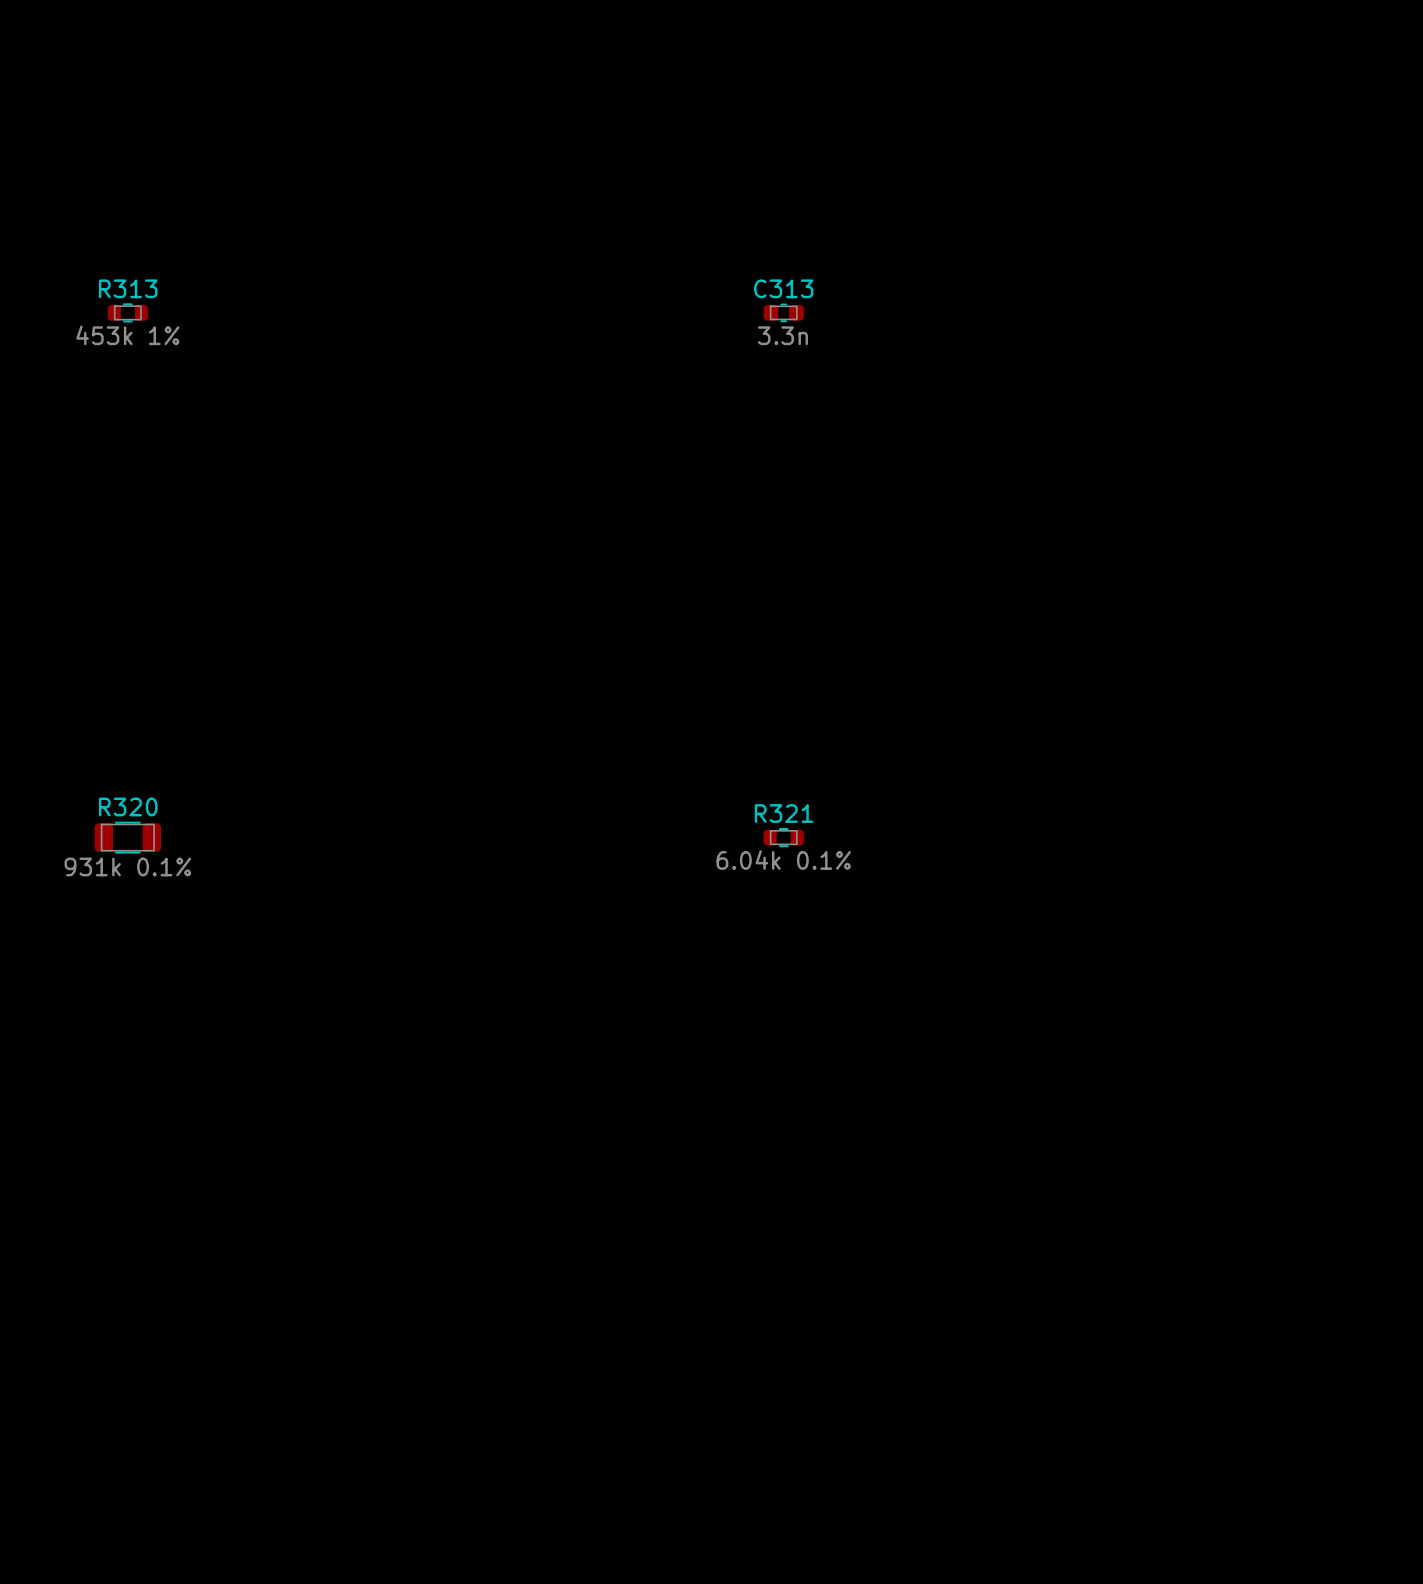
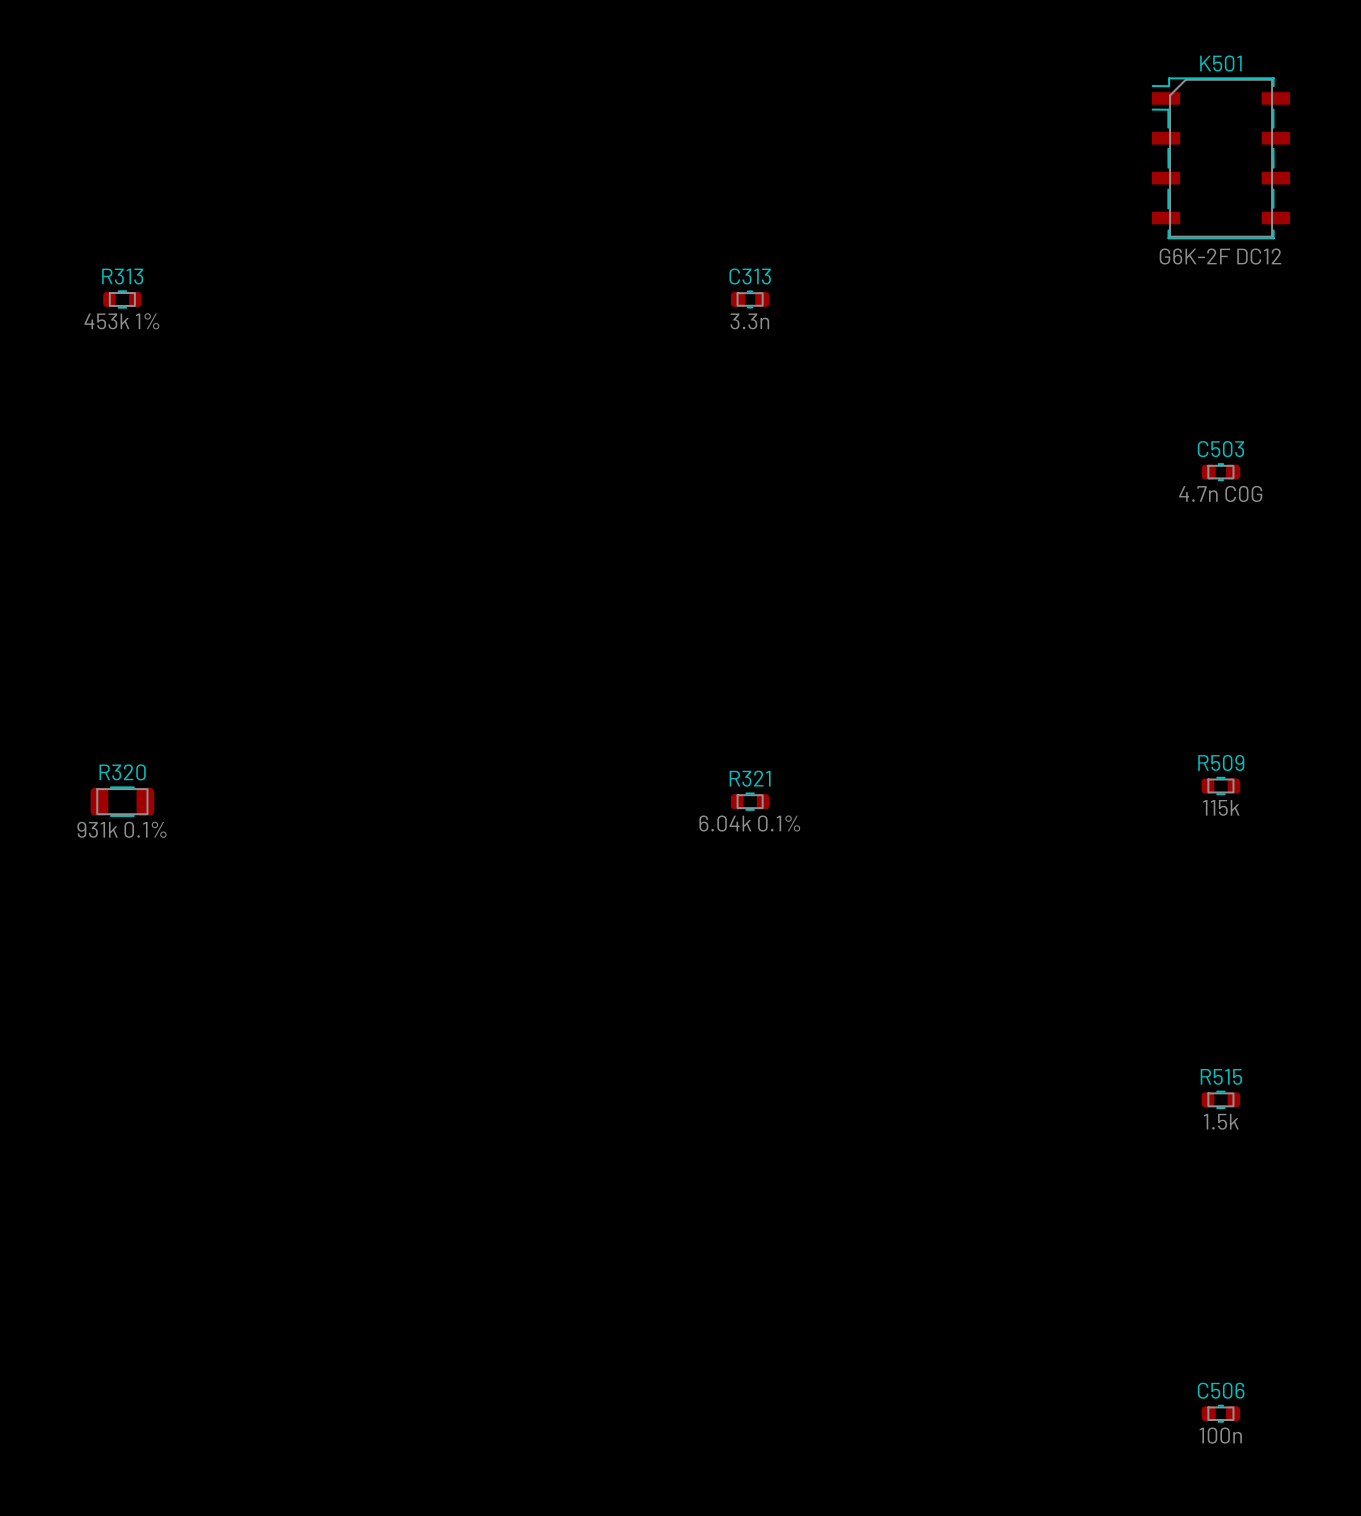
K501: none -> G6K-2F DC12 (1220, 158)
C503: none -> 4.7n C0G (1220, 472)
R509: none -> 115k (1220, 785)
R515: none -> 1.5k (1220, 1099)
C506: none -> 100n (1220, 1413)

